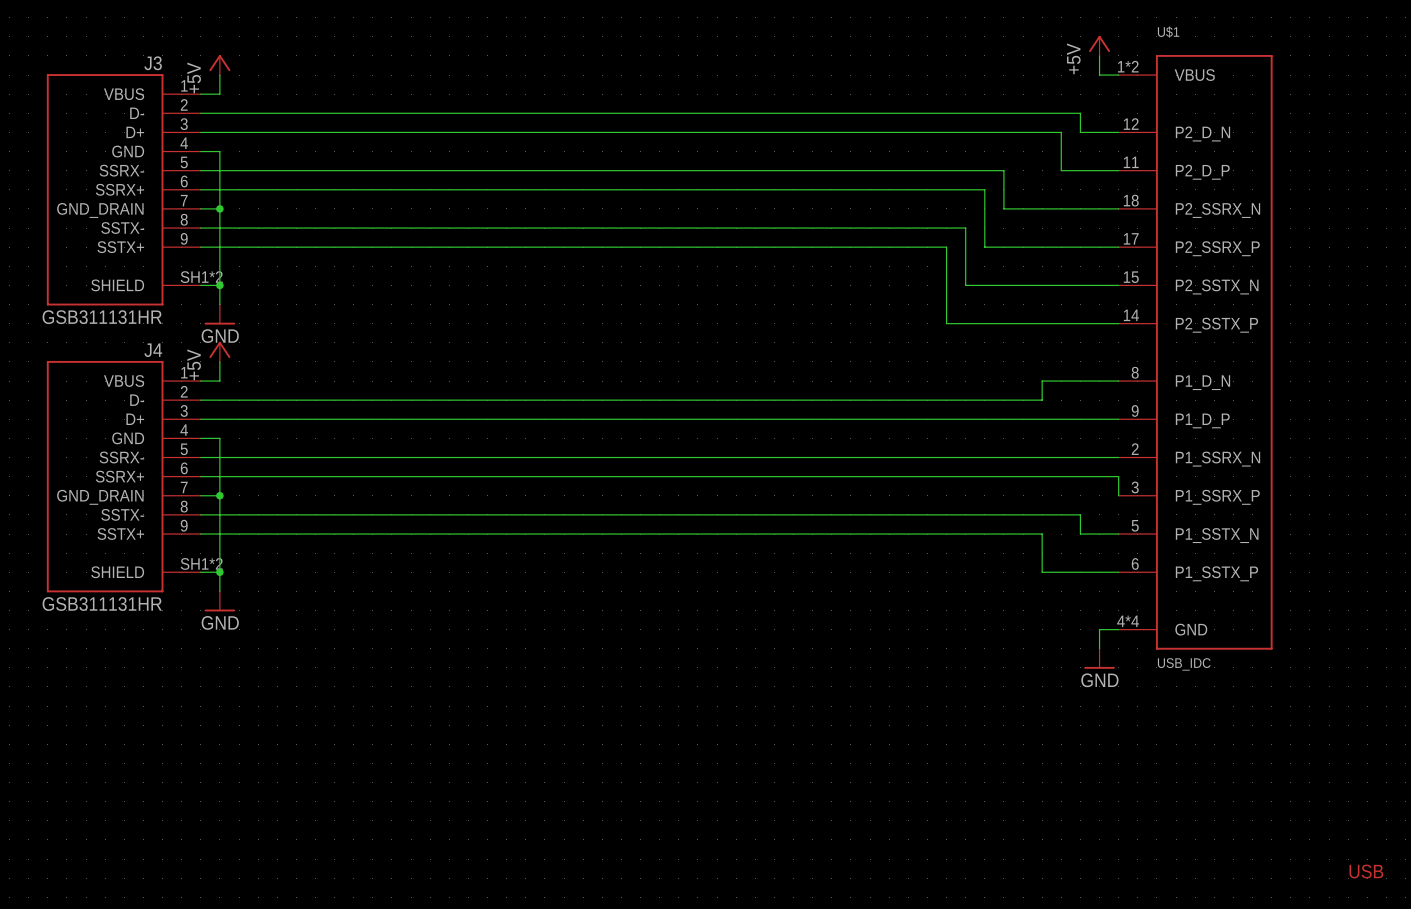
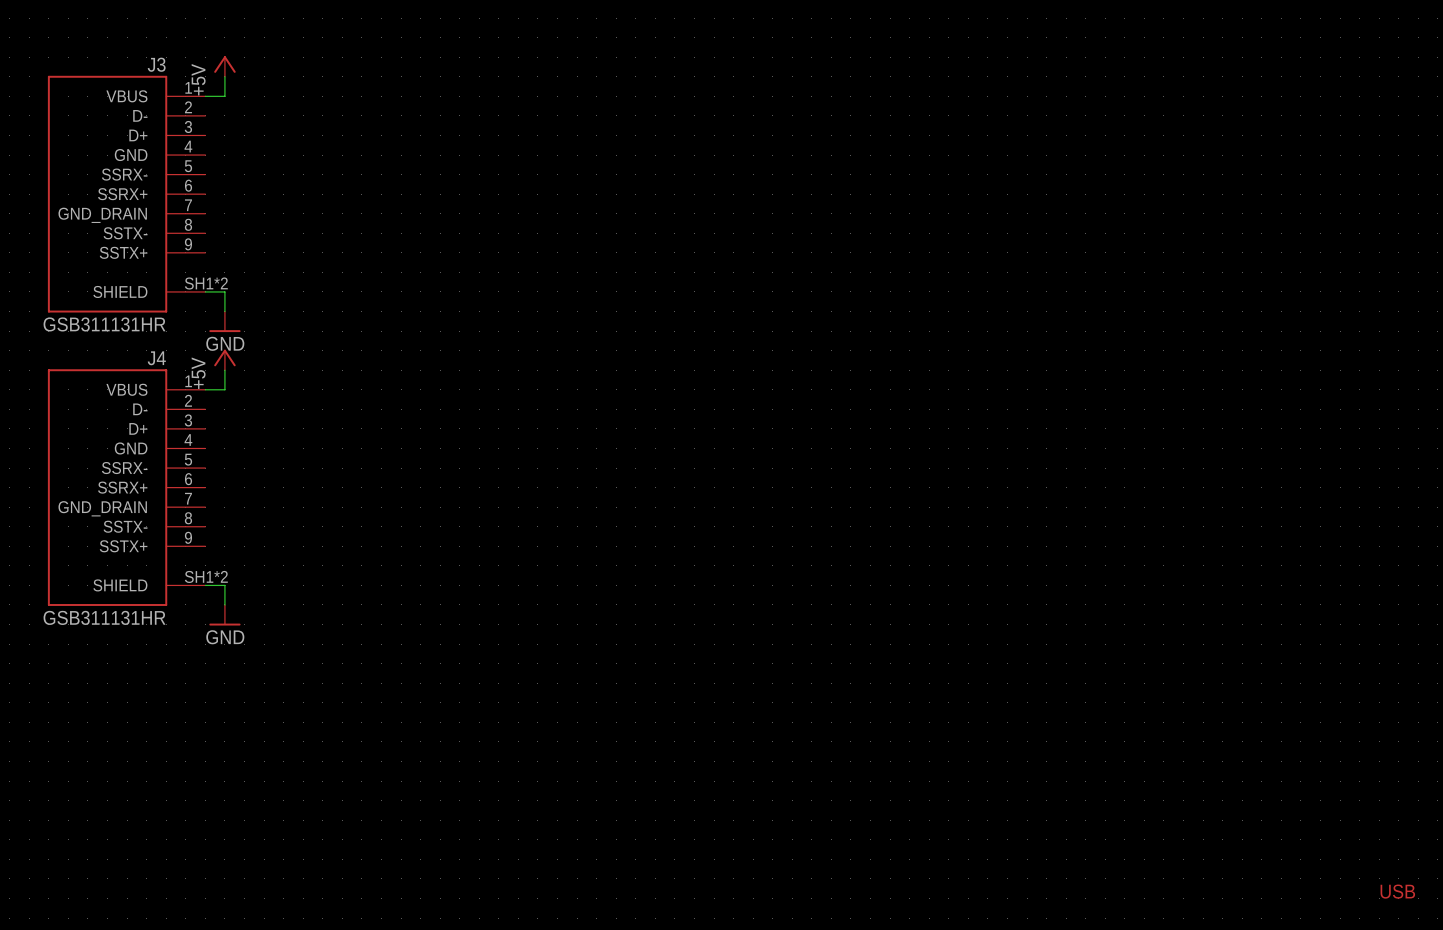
power symbol: +5V (1099, 45) -> none
wire: (1099, 55) (1099, 75) (1118, 75) -> none
wire: (200, 113) (1080, 113) (1080, 132) (1118, 132) -> none
wire: (200, 132) (1061, 132) (1061, 170) (1118, 170) -> none
wire: (200, 151) (219, 151) (219, 285) -> none
wire: (200, 170) (1003, 170) (1003, 208) (1118, 208) -> none
wire: (200, 189) (984, 189) (984, 247) (1118, 247) -> none
wire: (200, 208) (219, 208) -> none
junction: (219, 208) -> none
wire: (200, 228) (965, 228) (965, 285) (1118, 285) -> none
wire: (200, 247) (946, 247) (946, 323) (1118, 323) -> none
junction: (219, 285) -> none
U$1: USB_IDC (1195, 352) -> none
wire: (1118, 381) (1042, 381) (1042, 400) (200, 400) -> none
wire: (200, 419) (1118, 419) -> none
wire: (200, 438) (219, 438) (219, 572) -> none
wire: (200, 457) (1118, 457) -> none
wire: (200, 476) (1118, 476) (1118, 495) -> none
wire: (200, 495) (219, 495) -> none
junction: (219, 495) -> none
wire: (200, 514) (1080, 514) (1080, 534) (1118, 534) -> none
wire: (200, 534) (1042, 534) (1042, 572) (1118, 572) -> none
junction: (219, 572) -> none
wire: (1118, 629) (1099, 629) (1099, 648) -> none
power symbol: GND (1099, 658) -> none

